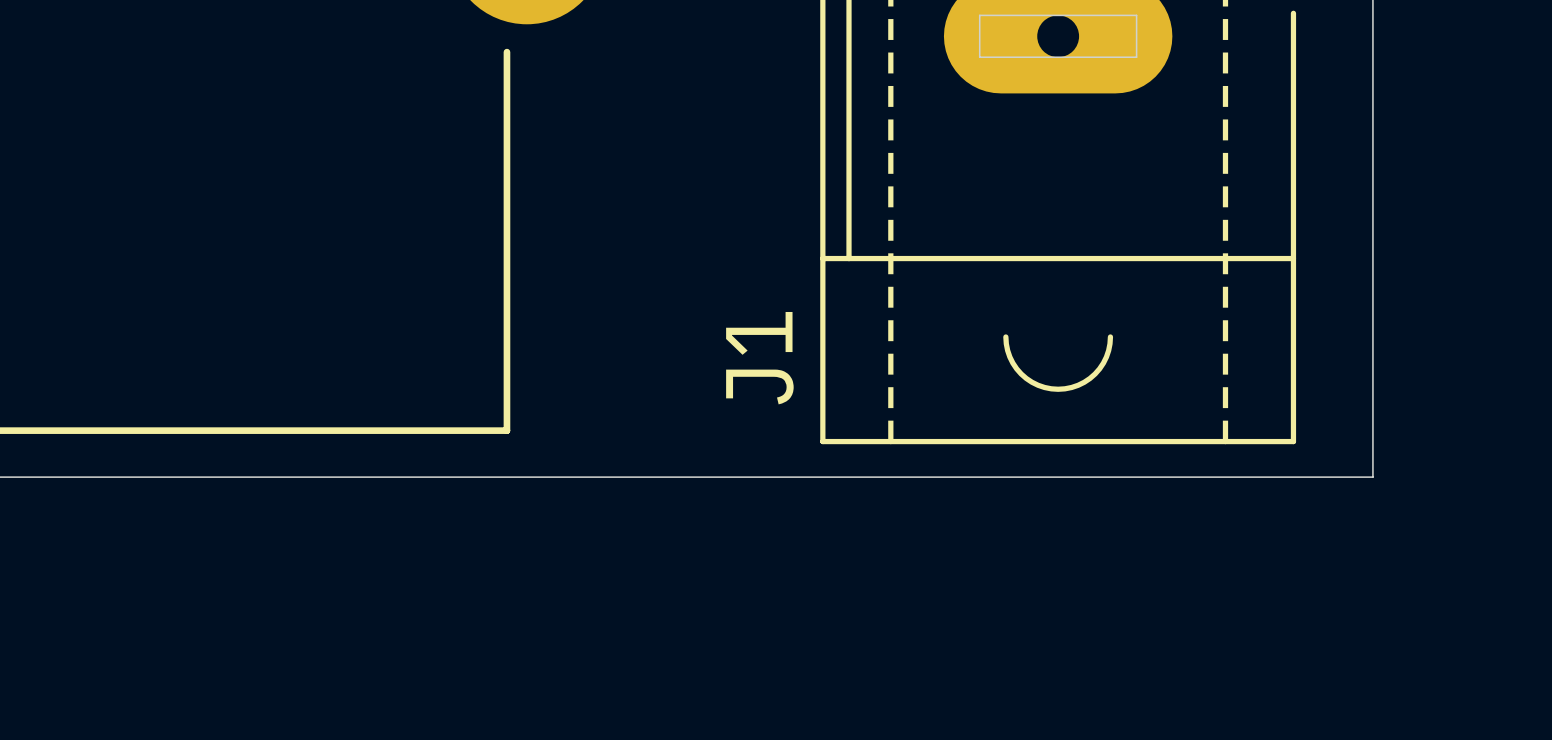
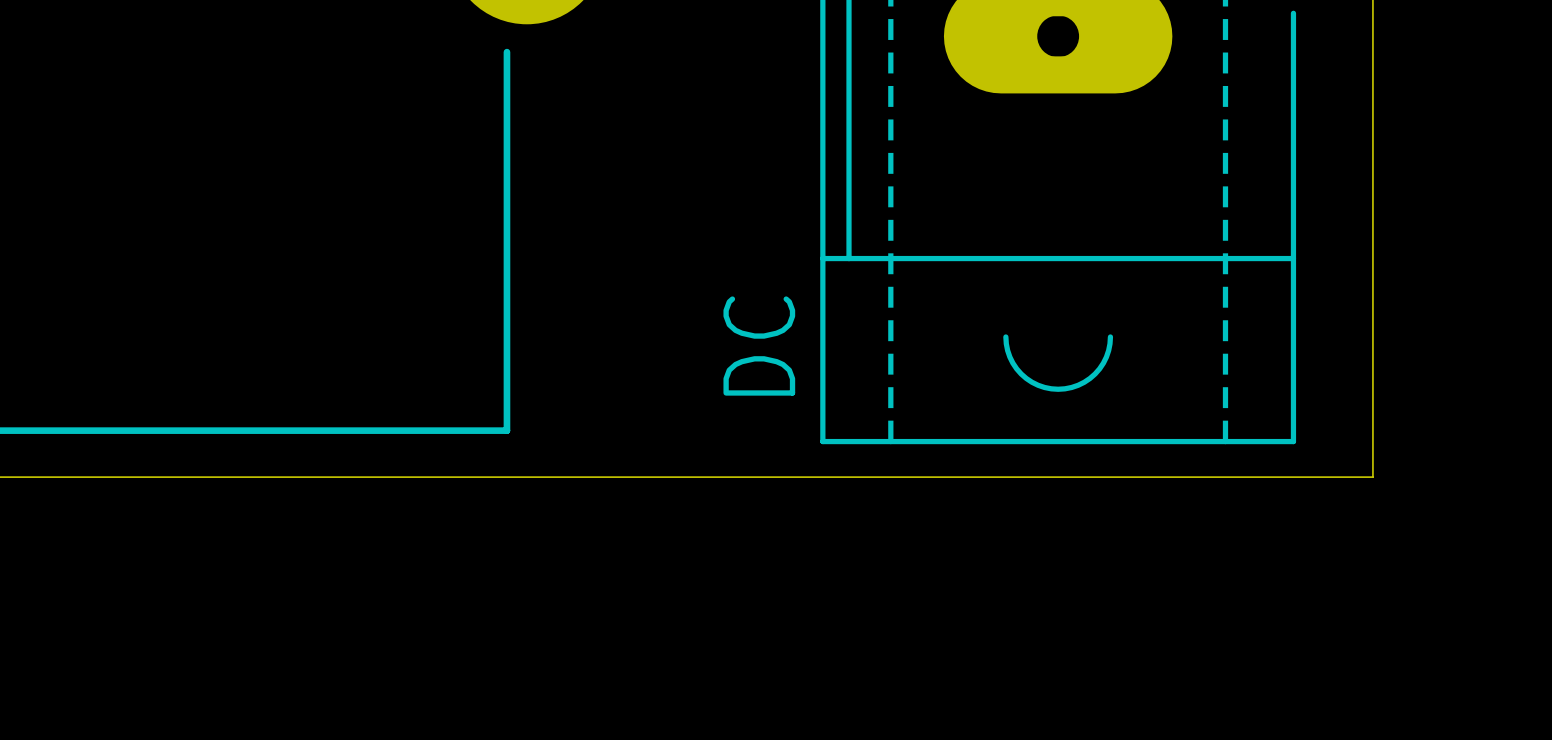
J1 name: J1 (759, 358) -> DC (759, 346)

